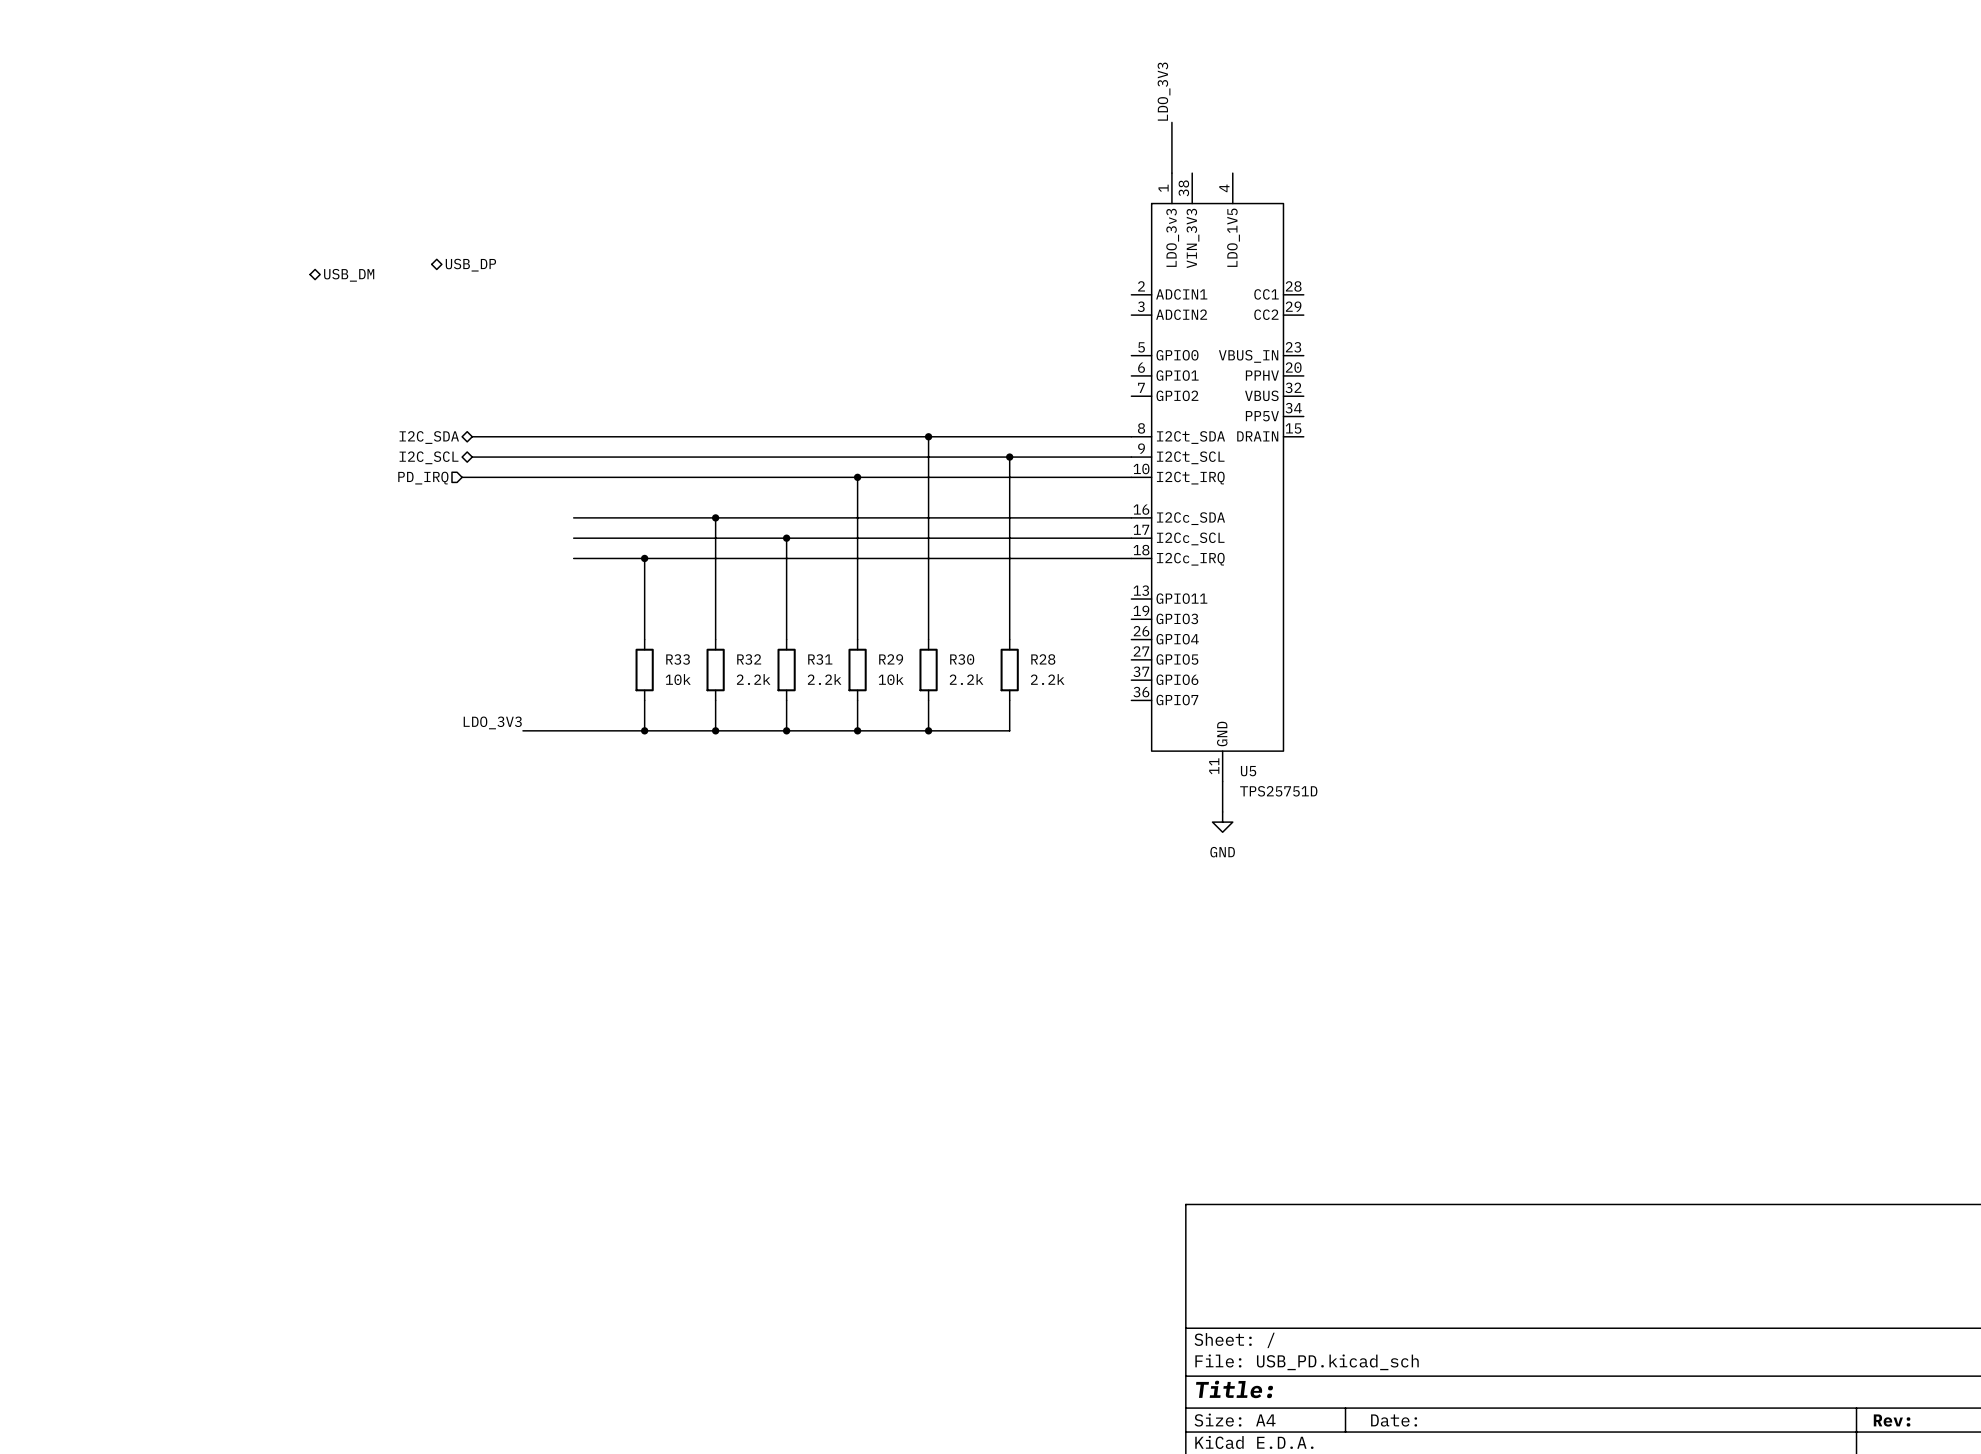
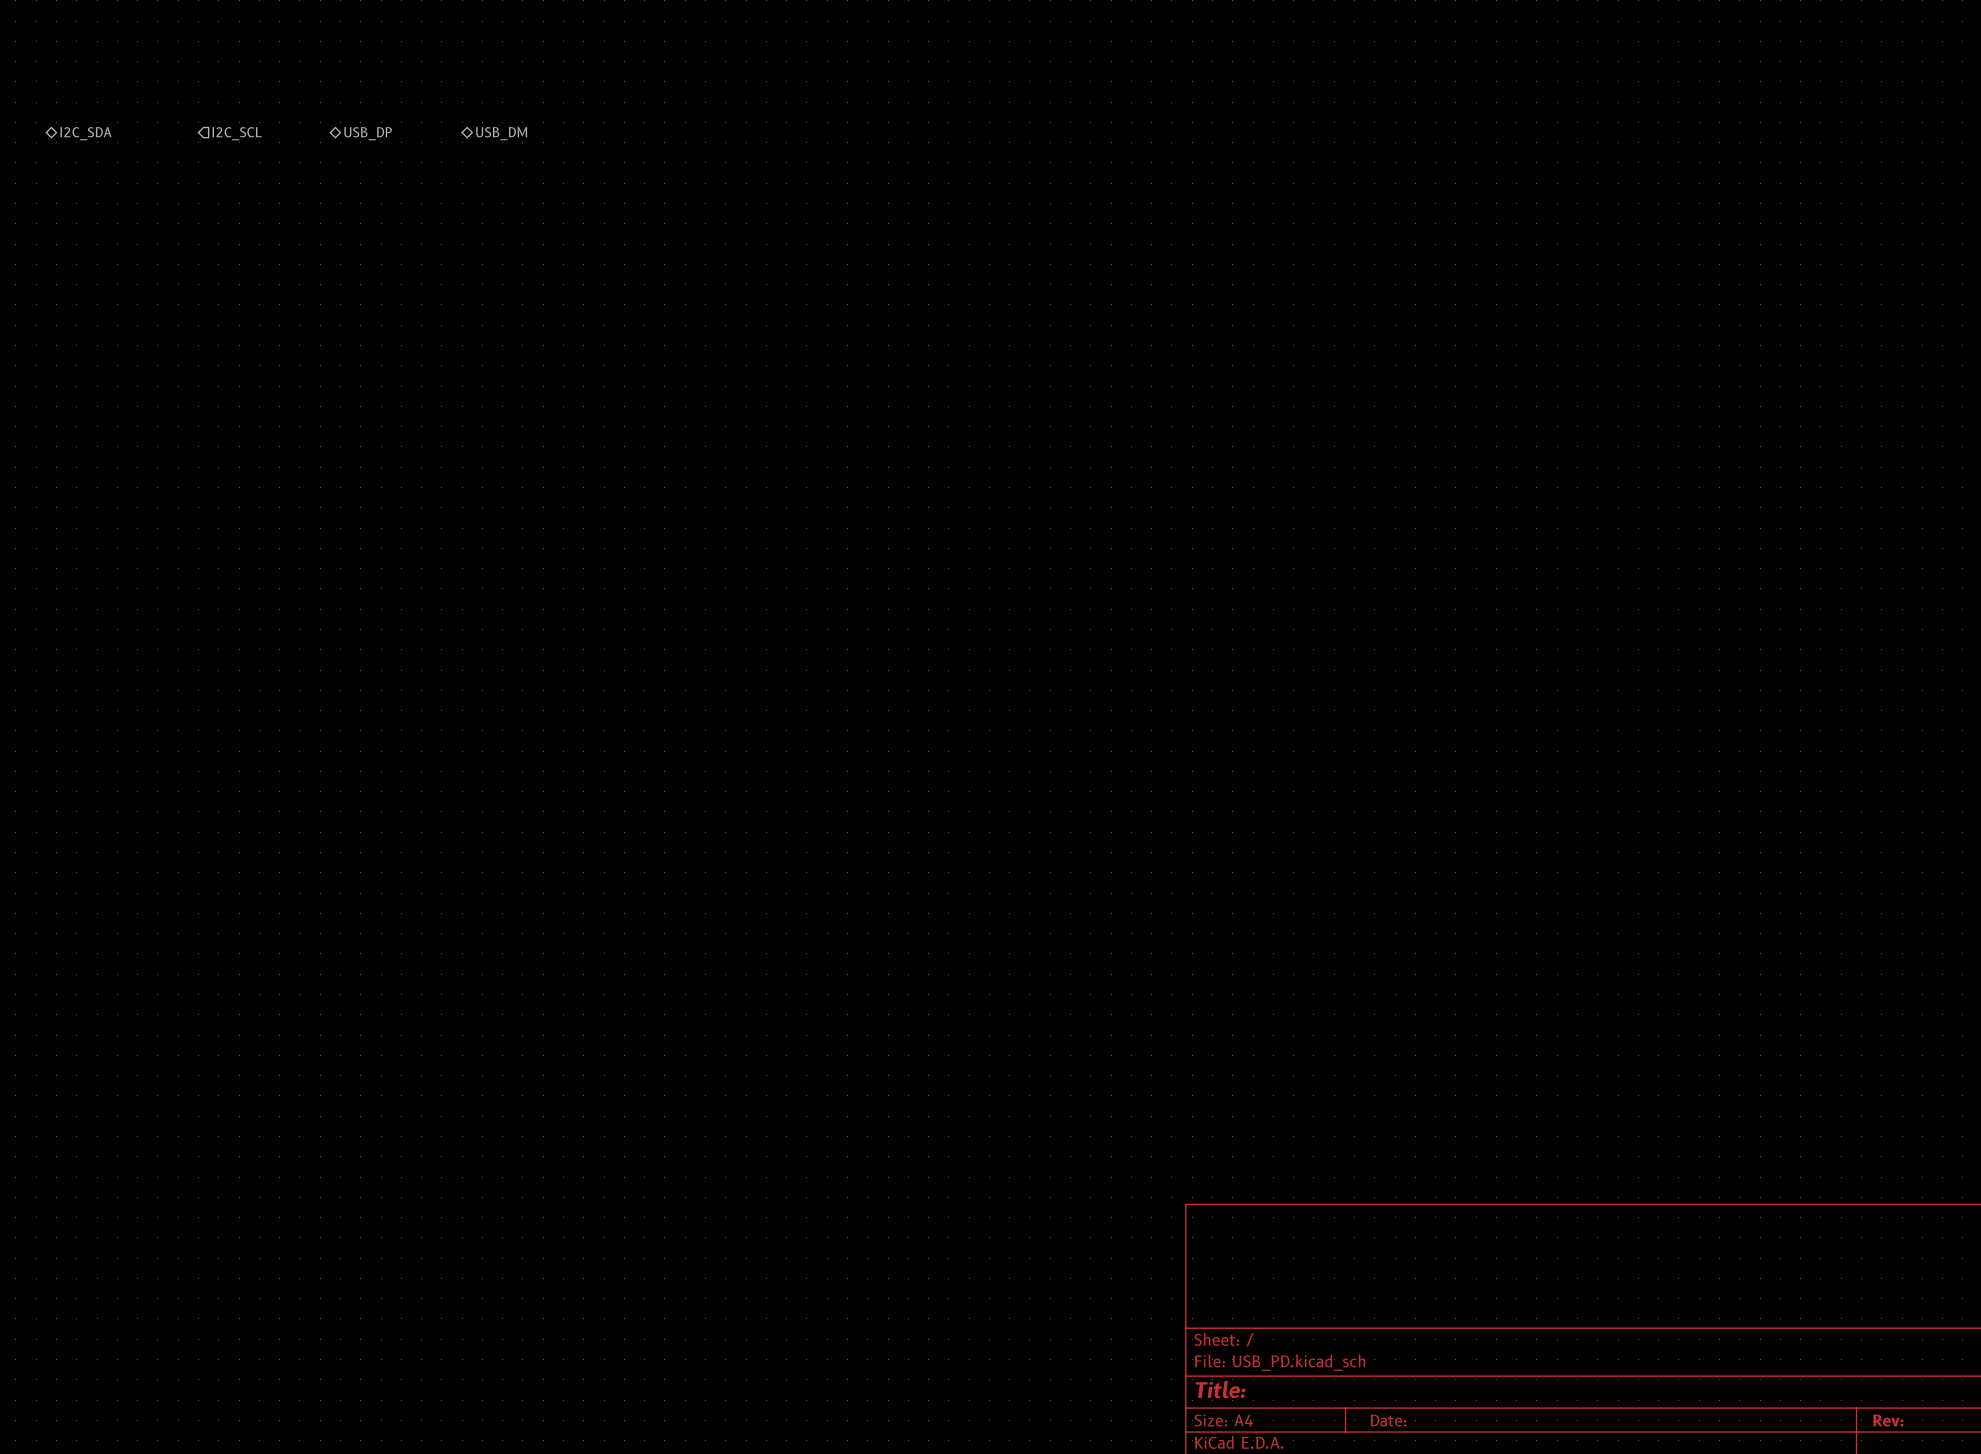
label: LDO_3V3 (1164, 91) -> none
wire: (1171, 122) (1171, 173) -> none
hierarchical label: none -> I2C_SDA (85, 133)
hierarchical label: none -> I2C_SCL (237, 133)
hierarchical label: none -> USB_DM (501, 133)
hierarchical label position: USB_DP (470, 265) -> USB_DP (368, 133)
hierarchical label: USB_DM (349, 275) -> none
wire: (472, 436) (1131, 436) -> none
wire: (928, 436) (928, 639) -> none
junction: (928, 436) -> none
hierarchical label: I2C_SDA (429, 437) -> none
hierarchical label: I2C_SCL (429, 457) -> none
wire: (472, 457) (1131, 457) -> none
wire: (1009, 457) (1009, 639) -> none
junction: (1009, 457) -> none
wire: (462, 477) (1131, 477) -> none
wire: (857, 477) (857, 639) -> none
junction: (857, 477) -> none
U5: TPS25751D (1217, 477) -> none
hierarchical label: PD_IRQ (423, 478) -> none
wire: (573, 517) (1131, 517) -> none
wire: (715, 517) (715, 639) -> none
junction: (715, 517) -> none
wire: (573, 538) (1131, 538) -> none
wire: (786, 538) (786, 639) -> none
junction: (786, 538) -> none
wire: (573, 558) (1131, 558) -> none
wire: (644, 558) (644, 639) -> none
junction: (644, 558) -> none
R33: 10k (644, 670) -> none
R32: 2.2k (715, 670) -> none
R31: 2.2k (786, 670) -> none
R29: 10k (857, 670) -> none
R30: 2.2k (928, 670) -> none
R28: 2.2k (1009, 670) -> none
wire: (644, 700) (644, 730) -> none
wire: (715, 700) (715, 730) -> none
wire: (786, 700) (786, 730) -> none
wire: (857, 700) (857, 730) -> none
wire: (928, 700) (928, 730) -> none
wire: (1009, 700) (1009, 730) (522, 730) -> none
label: LDO_3V3 (492, 722) -> none
junction: (644, 730) -> none
junction: (715, 730) -> none
junction: (786, 730) -> none
junction: (857, 730) -> none
junction: (928, 730) -> none
wire: (1222, 781) (1222, 811) -> none
power symbol: GND (1222, 822) -> none

